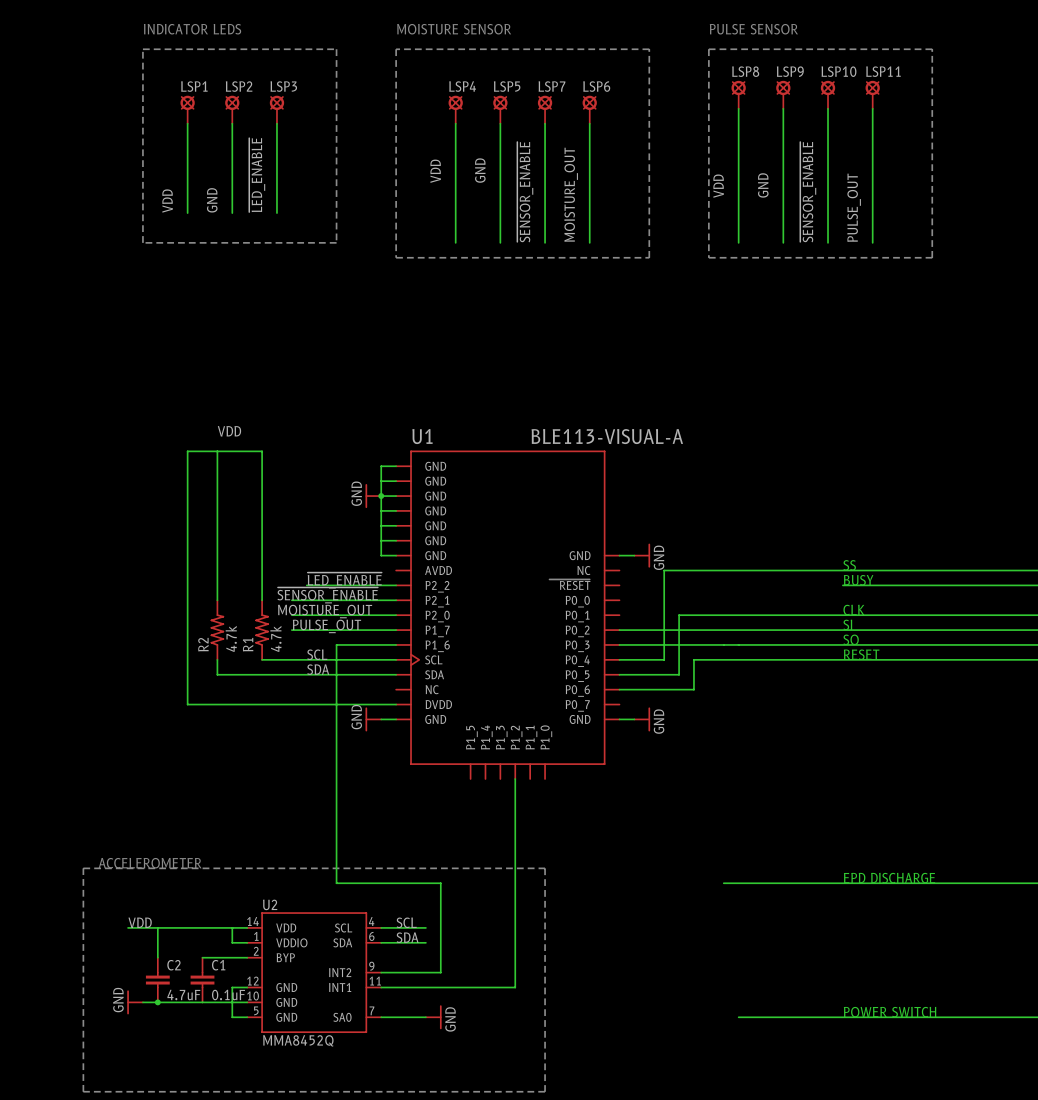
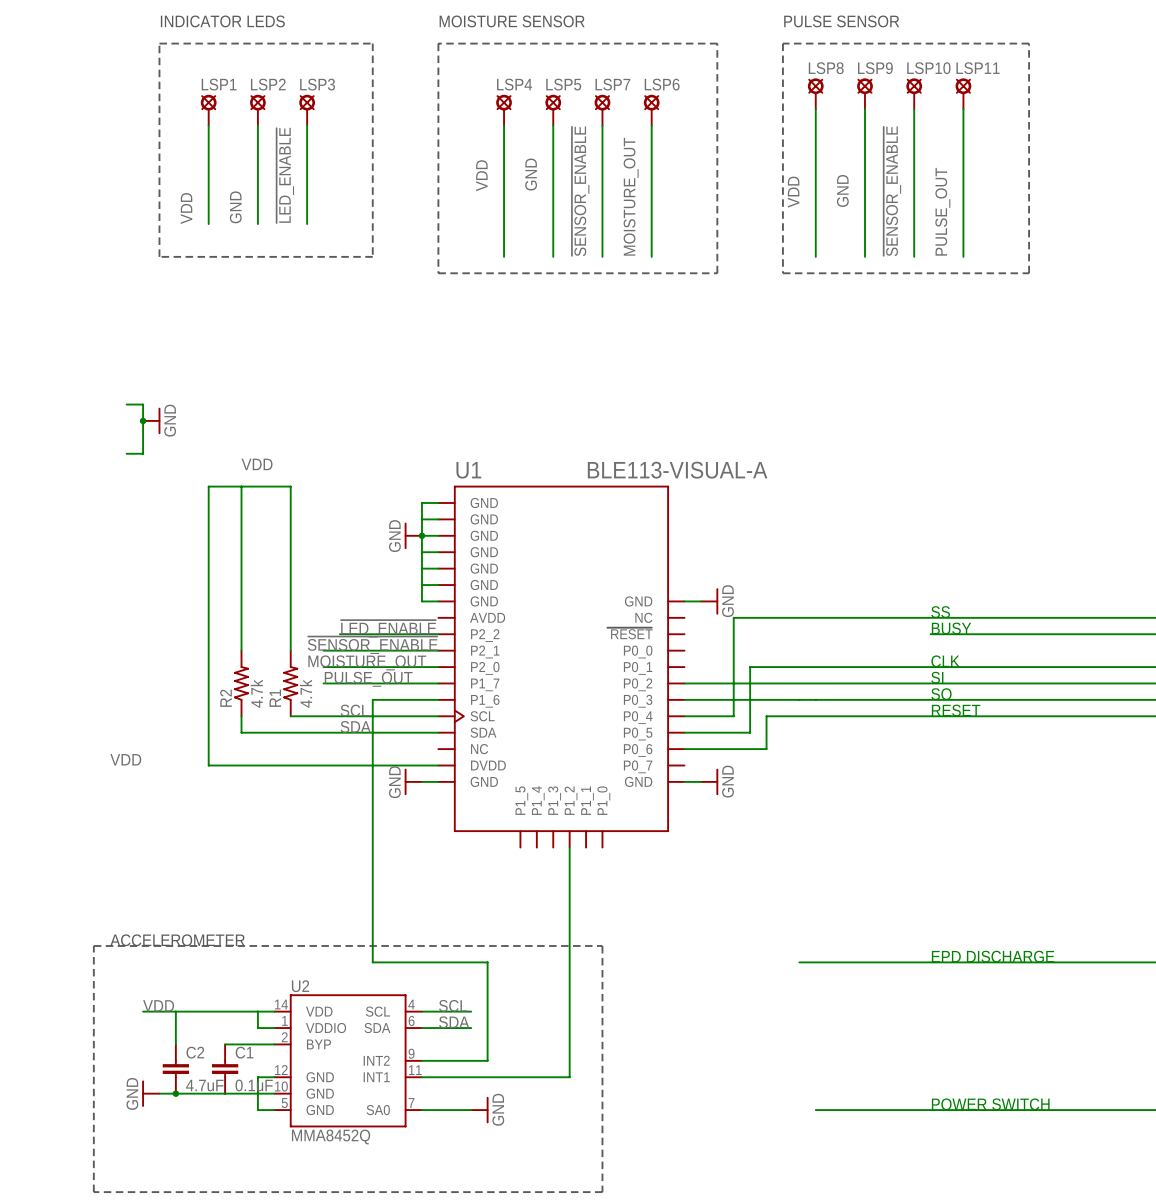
wire: none -> (126, 404) (143, 404) (143, 453) (126, 453)
junction: none -> (143, 420)
power symbol: none -> GND (151, 420)
label: none -> VDD (125, 759)

